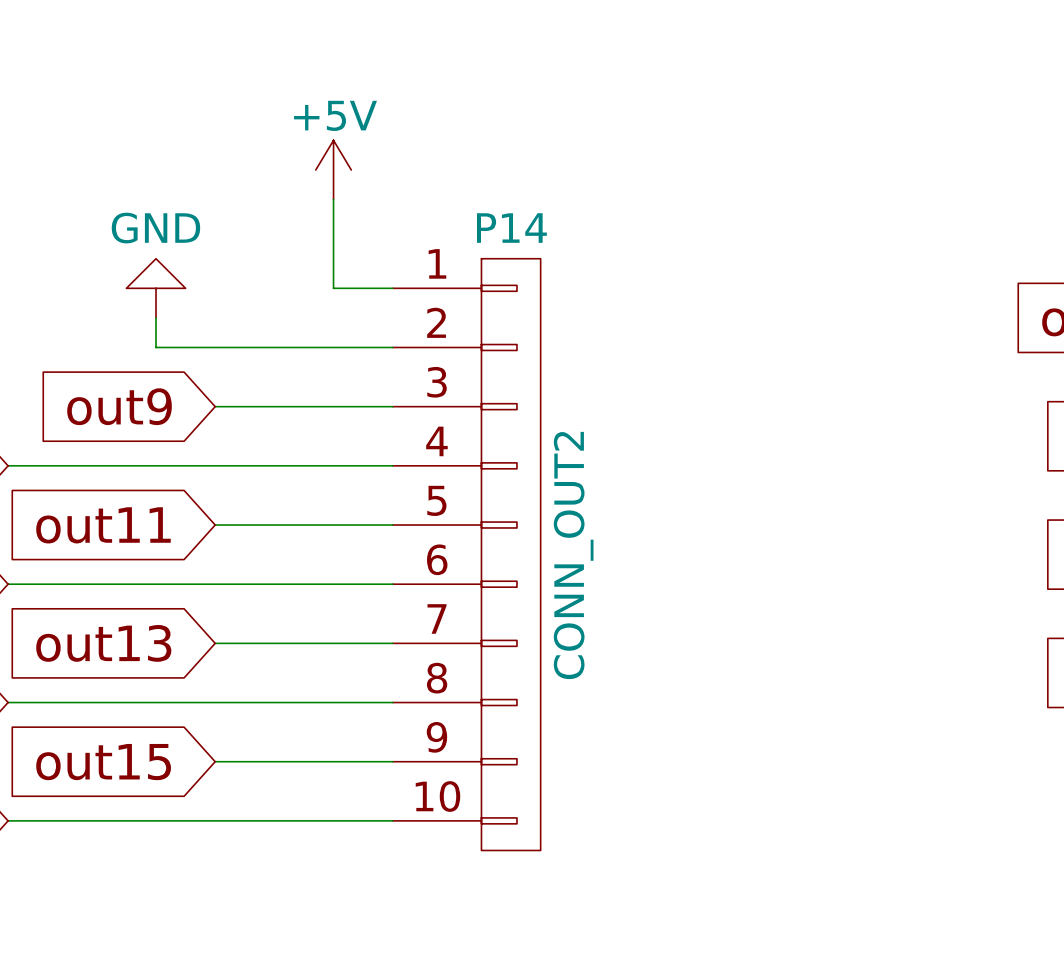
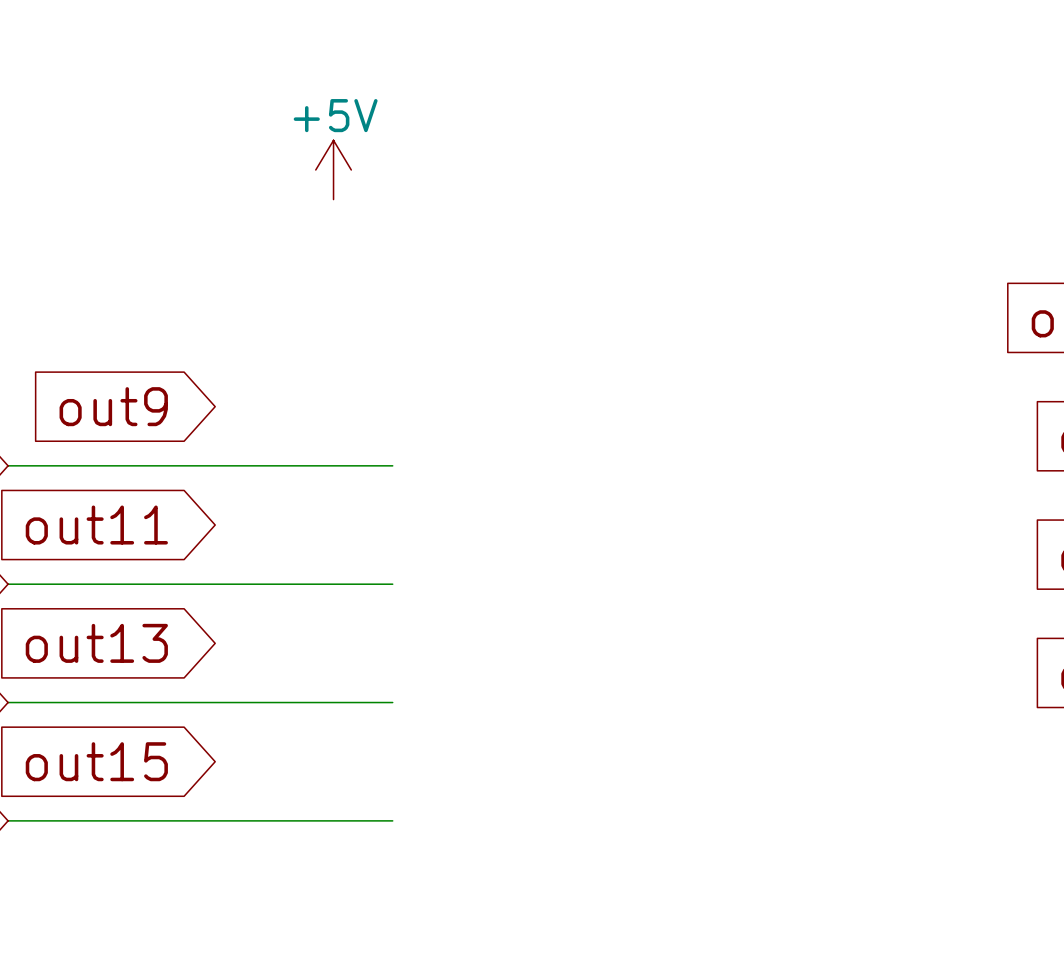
wire: (333, 199) (333, 288) (392, 288) -> none
power symbol: GND (156, 288) -> none
wire: (156, 317) (156, 347) (392, 347) -> none
wire: (215, 406) (392, 406) -> none
wire: (215, 525) (392, 525) -> none
P14: CONN_OUT2 (466, 554) -> none
wire: (215, 643) (392, 643) -> none
wire: (215, 761) (392, 761) -> none

